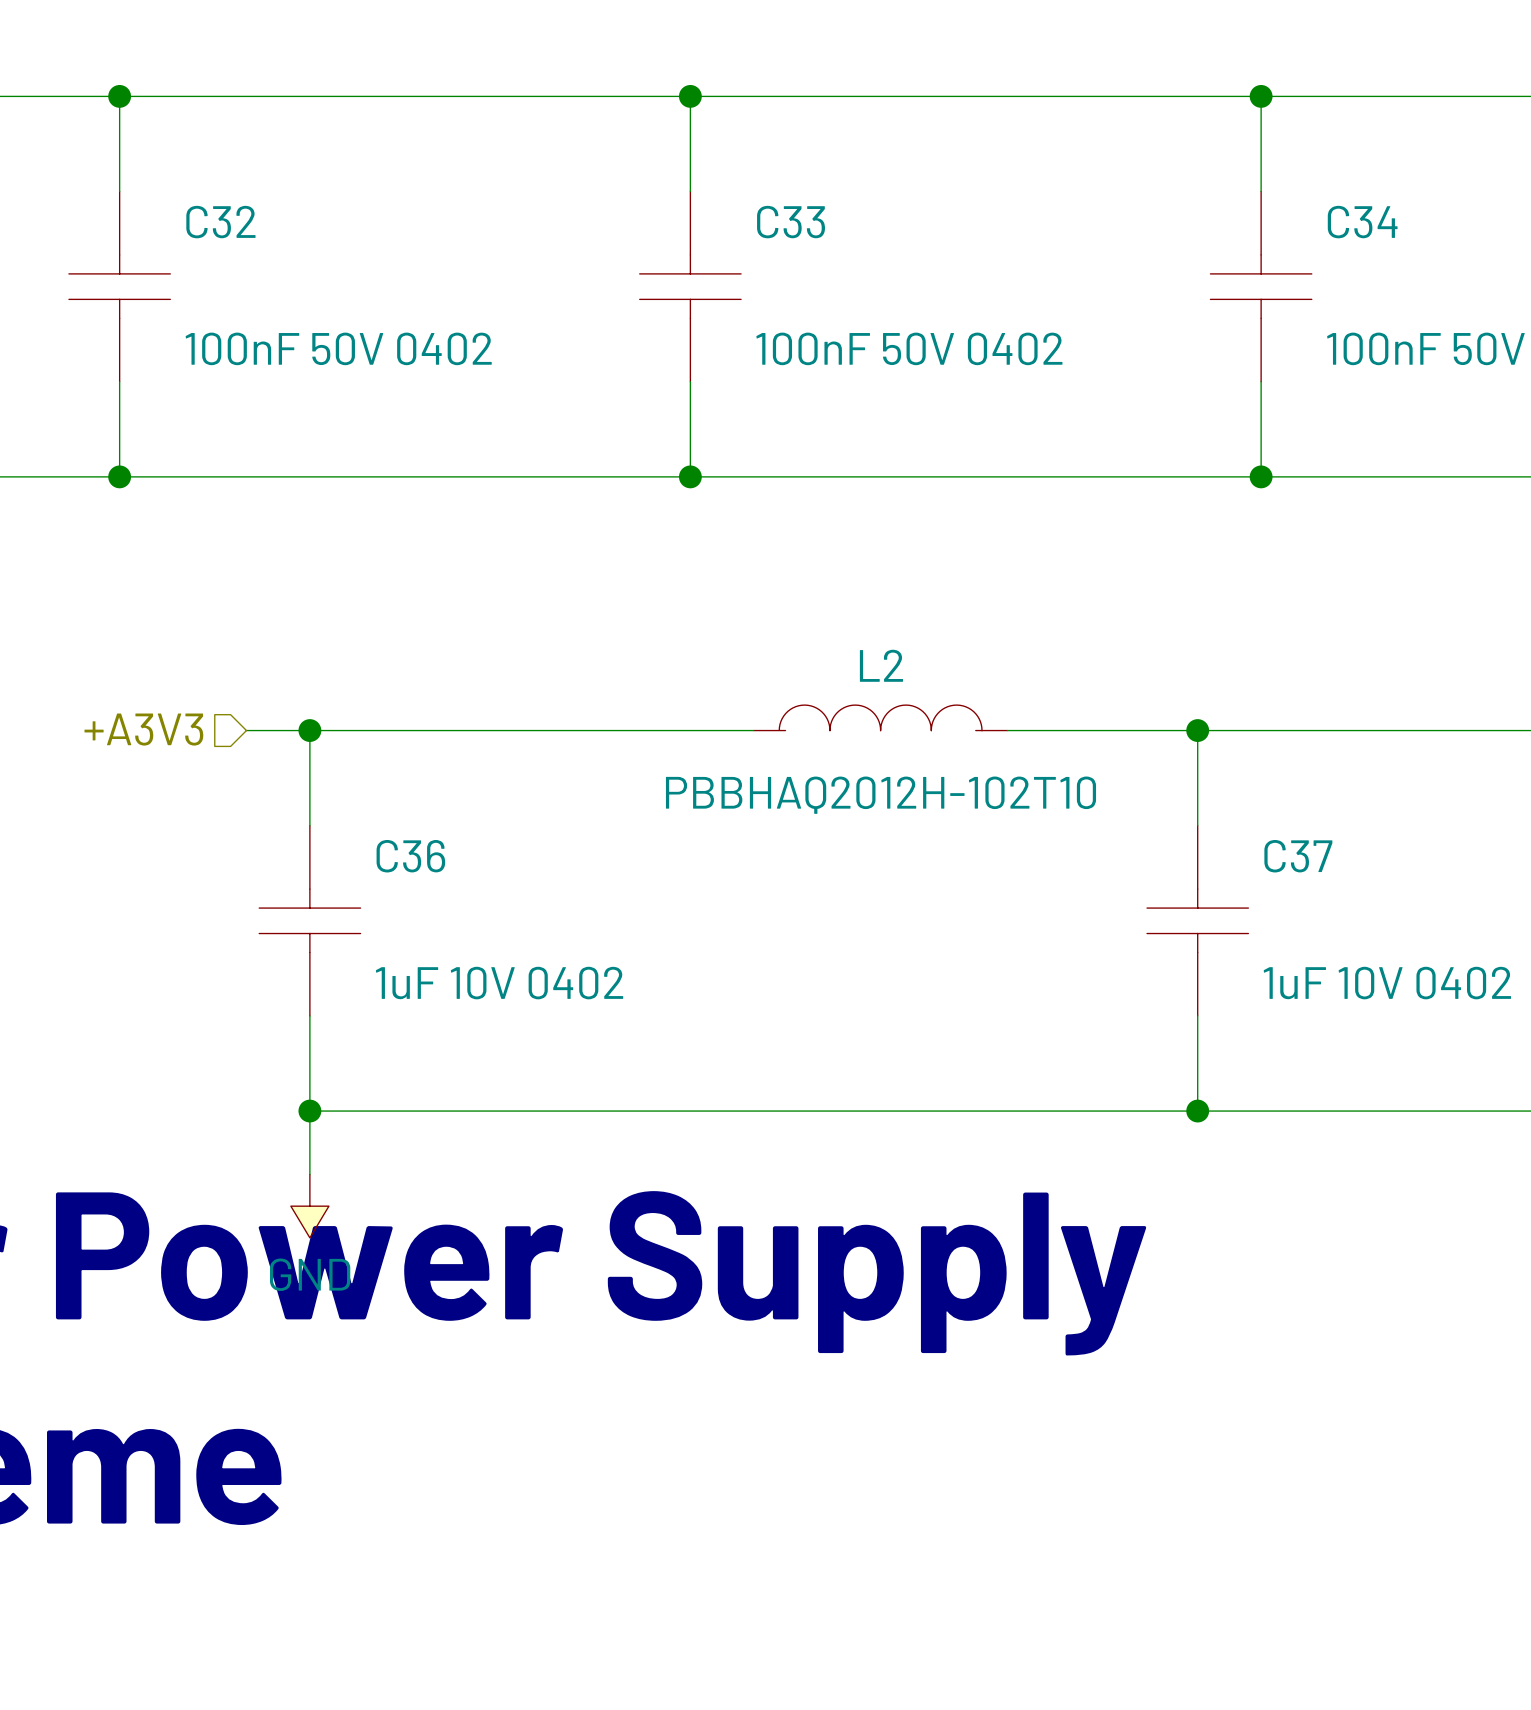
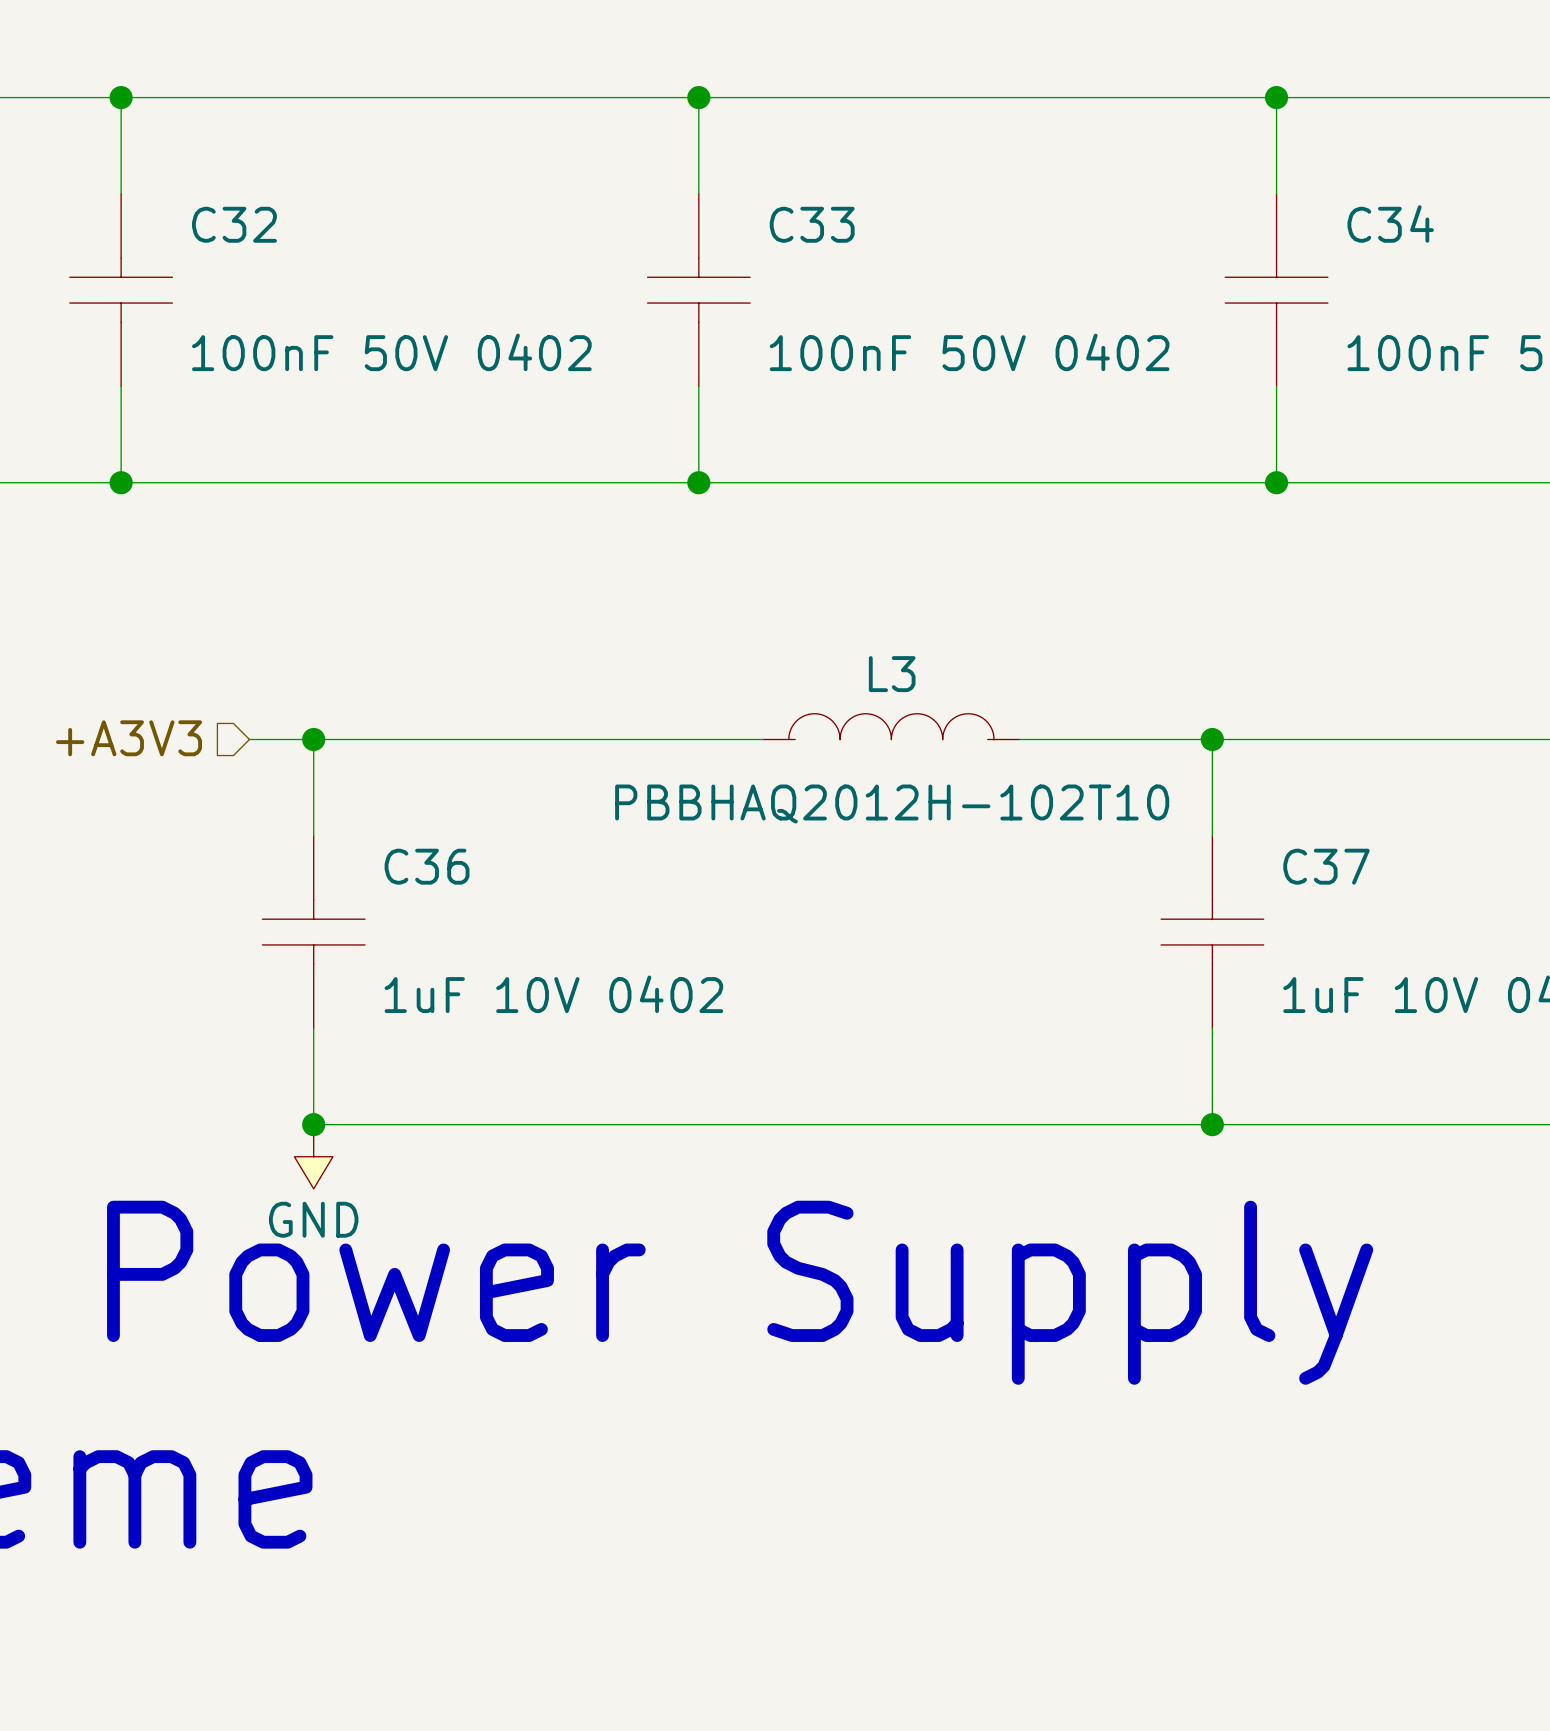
L2 name: L2 (881, 665) -> L3 (892, 674)
power symbol position: GND (309, 1206) -> GND (313, 1156)
power symbol text position: GND (310, 1274) -> GND (313, 1219)

